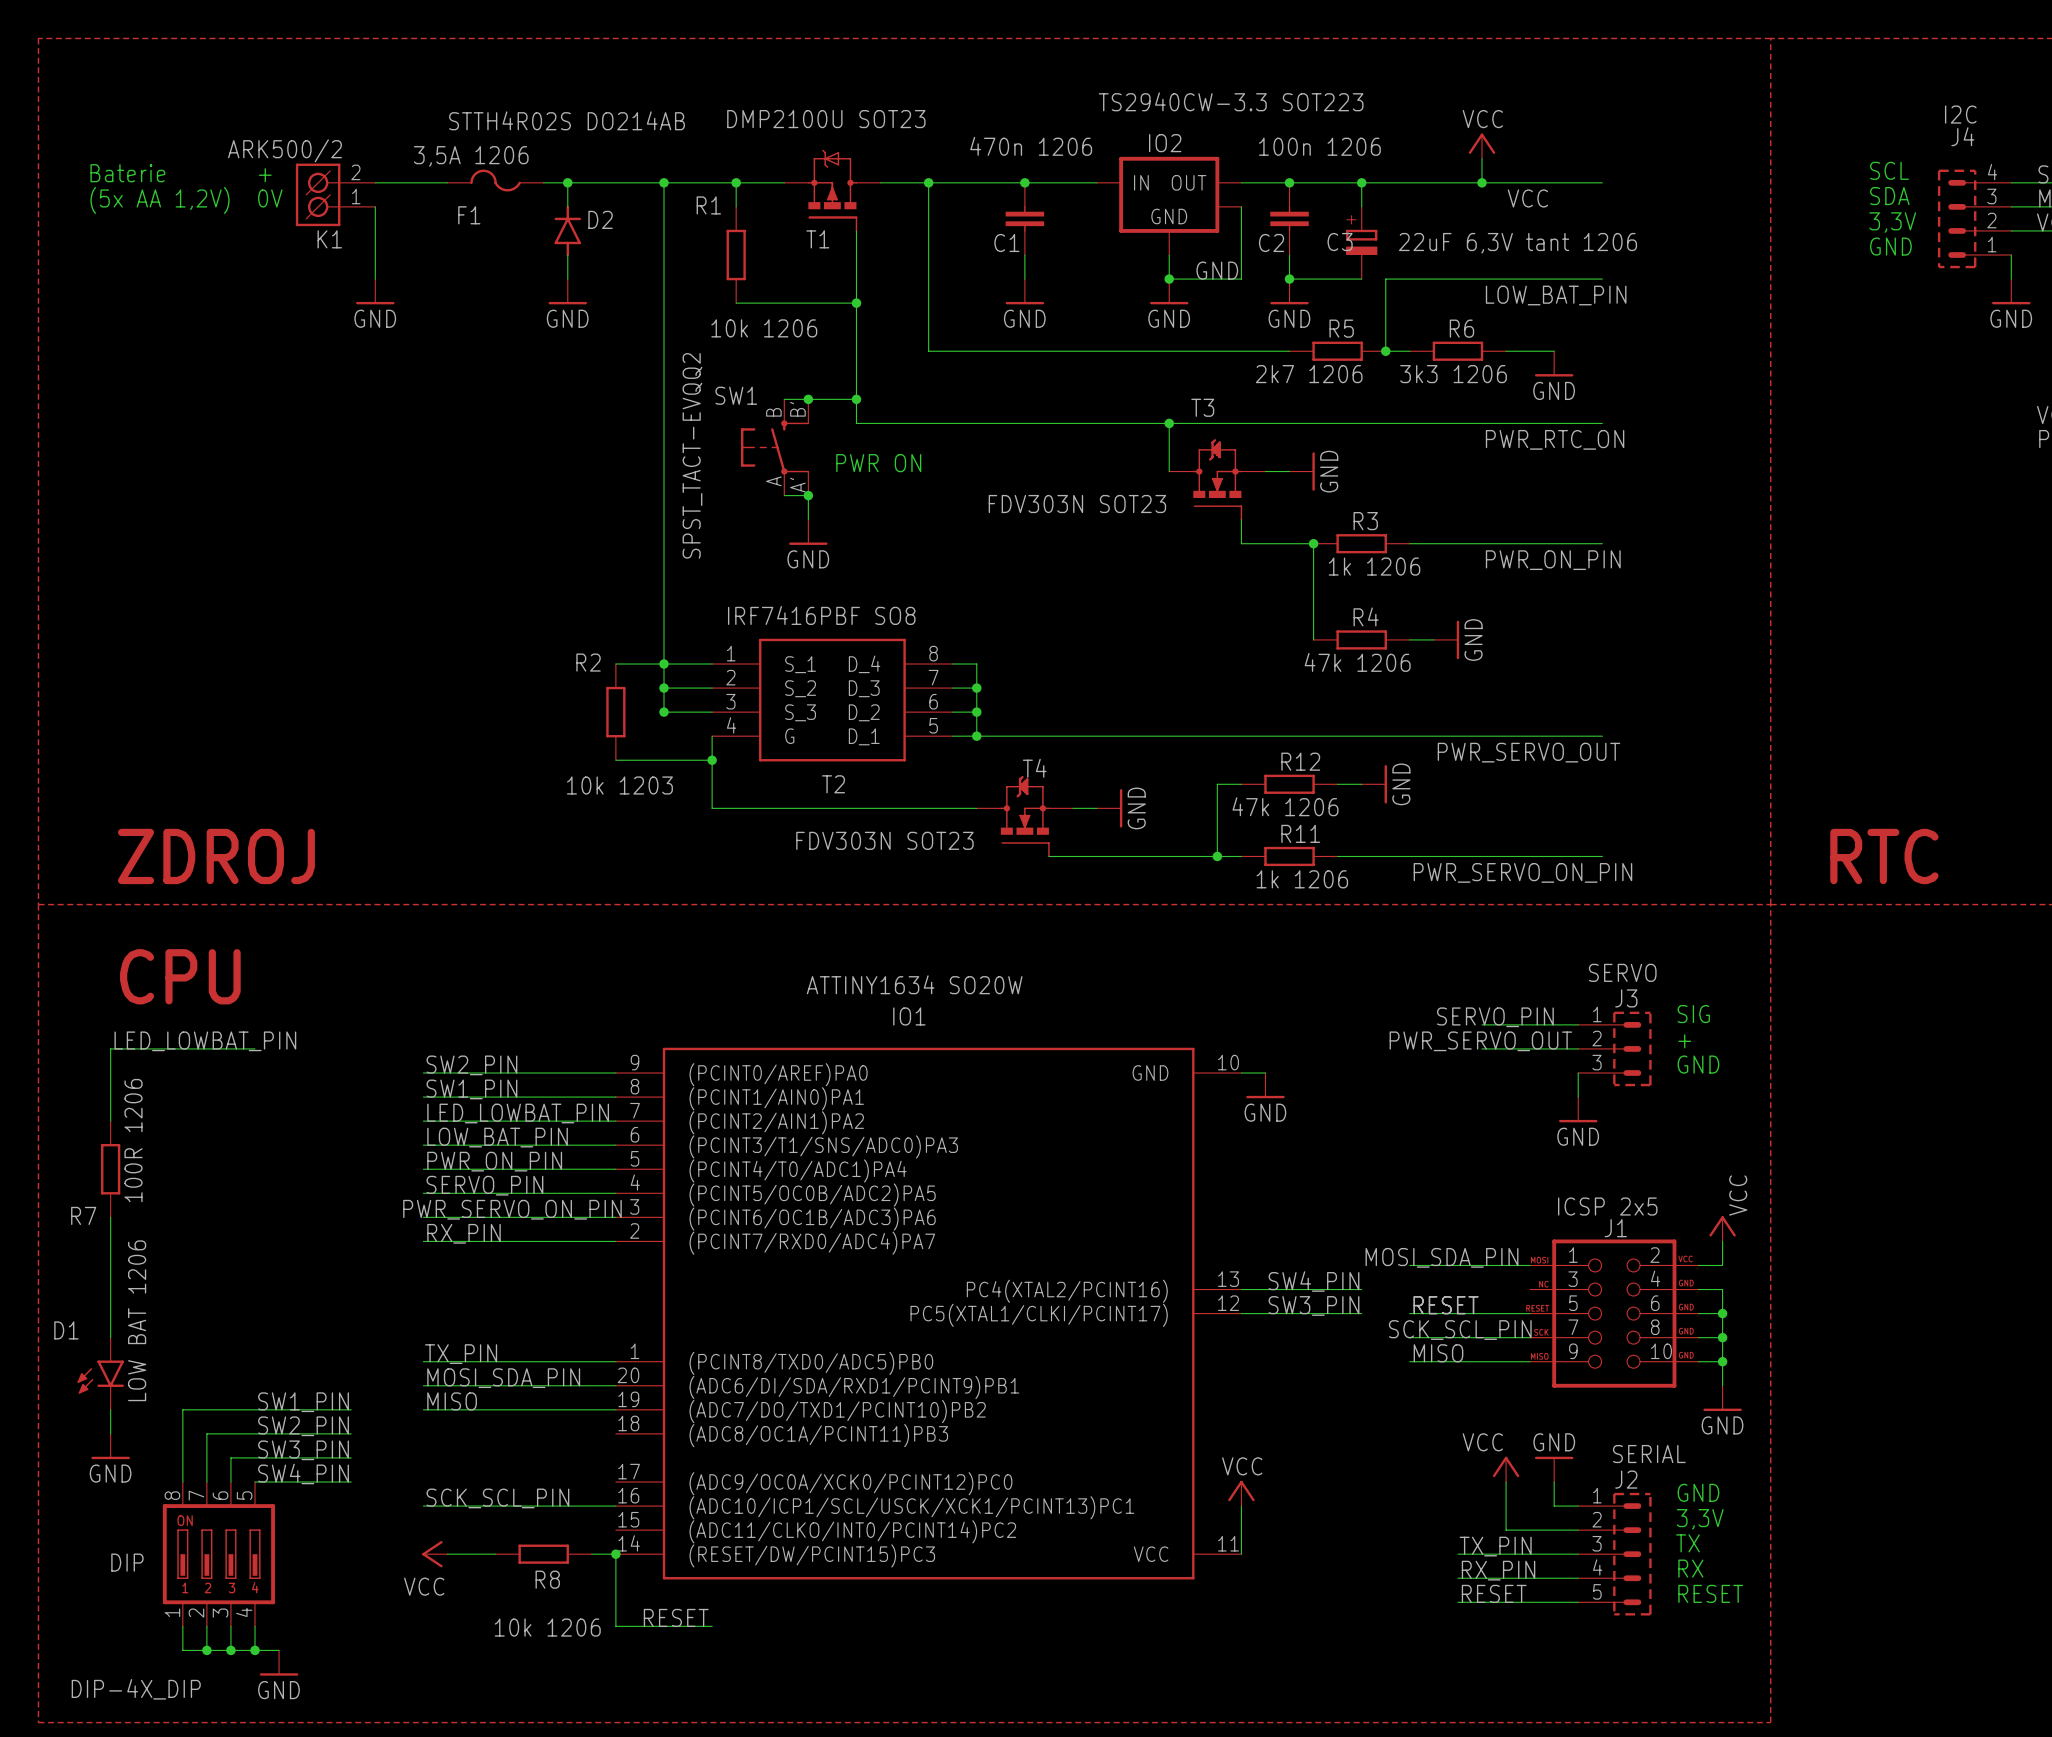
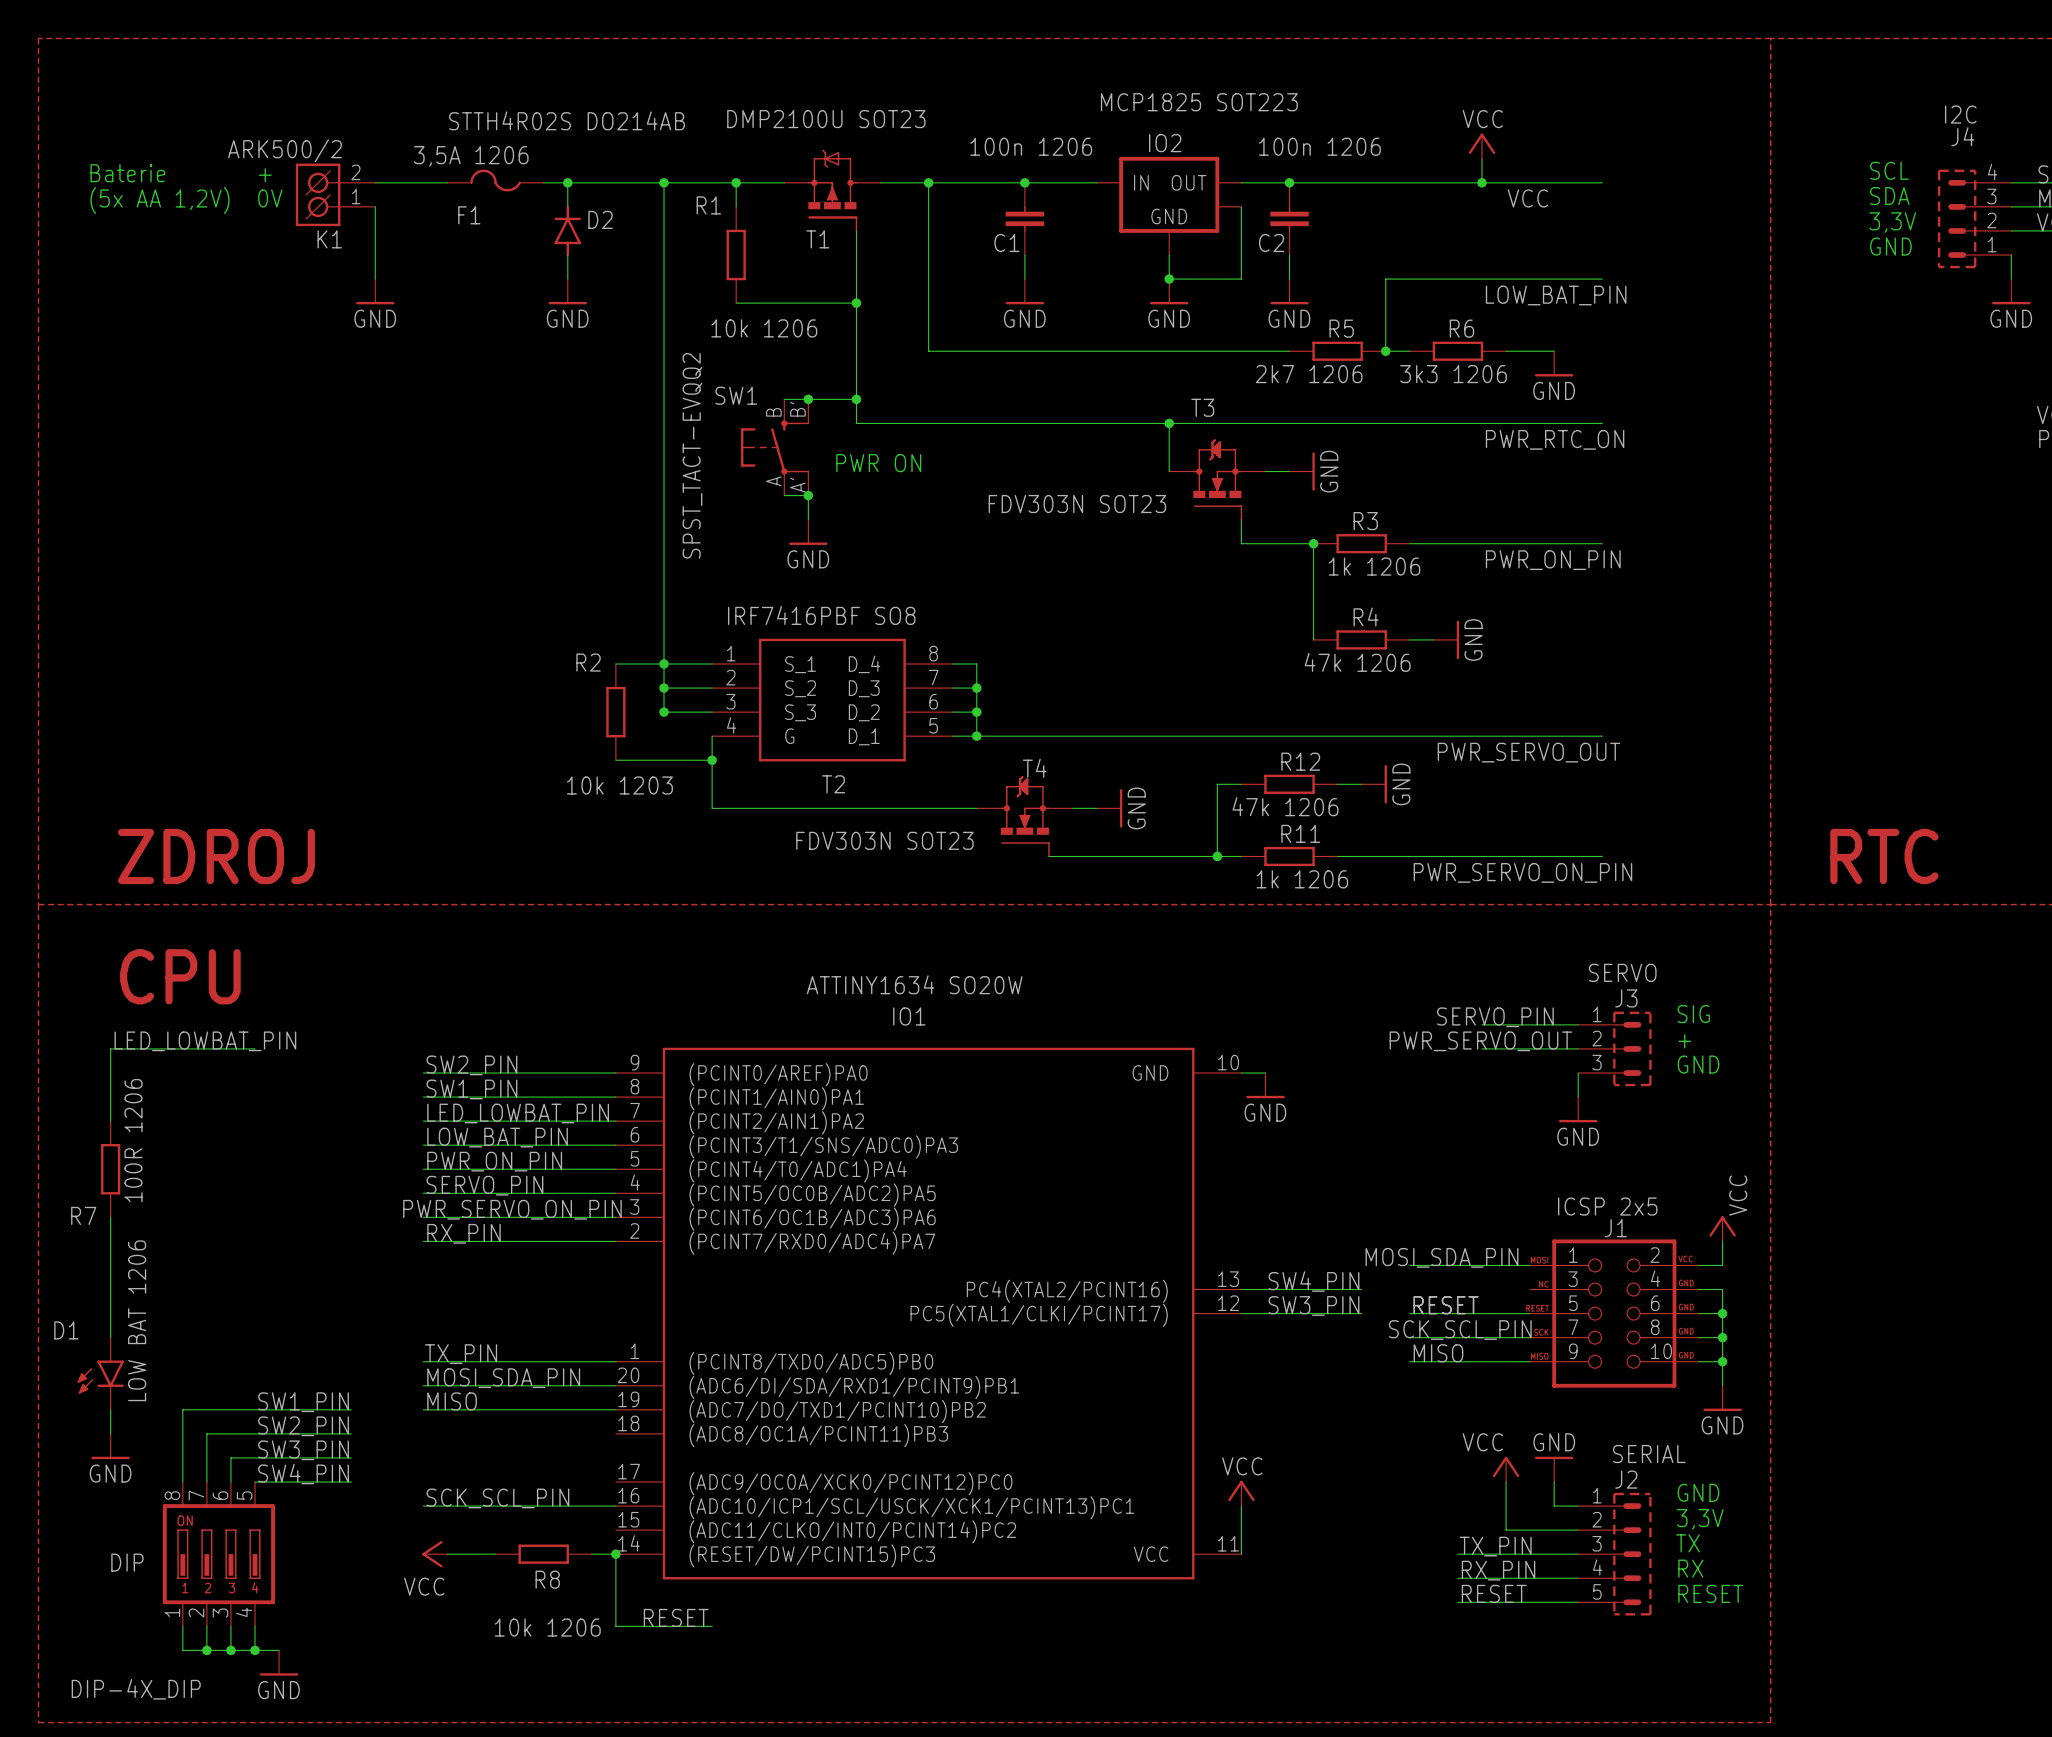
IO2 value: TS2940CW-3.3 SOT223 (1231, 101) -> MCP1825 SOT223 (1199, 102)
C1 value: 470n 1206 (1031, 146) -> 100n 1206 (1031, 146)
wire: (1361, 182) (1361, 206) -> none
junction: (1361, 182) -> none
C3: 22uF 6,3V tant 1206 (1361, 242) -> none
label: GND (1217, 270) -> none
wire: (1289, 279) (1361, 279) -> none
junction: (1289, 279) -> none

